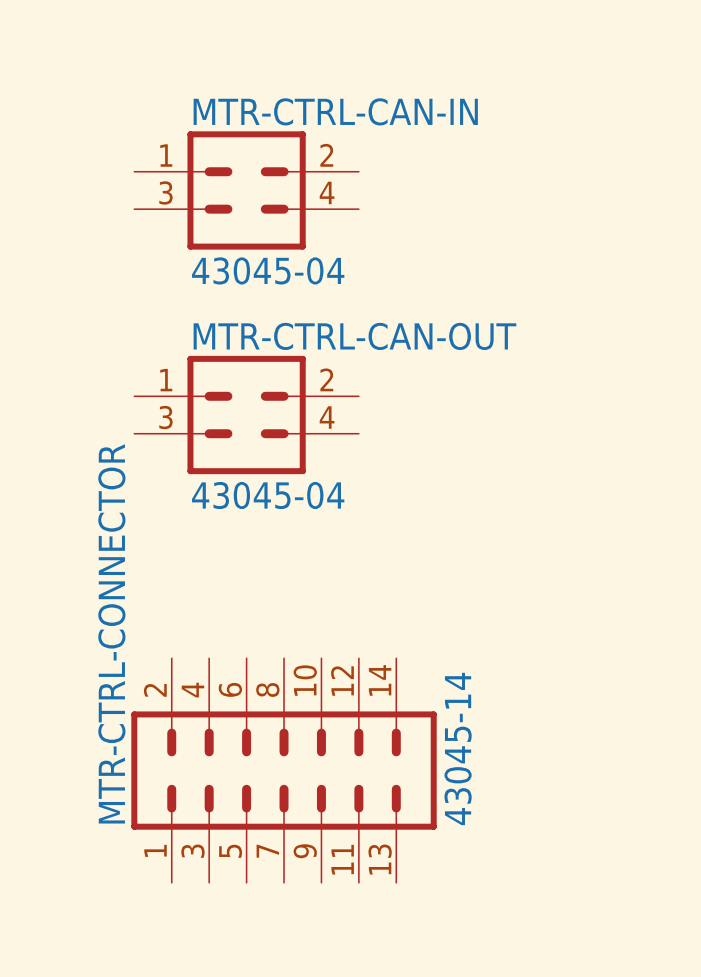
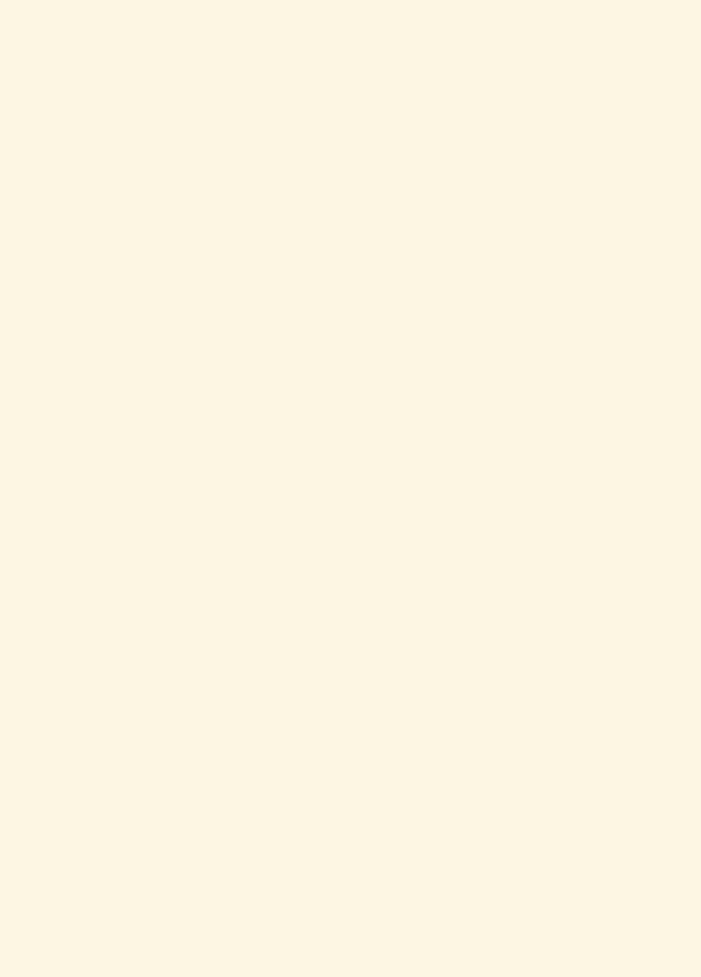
MTR-CTRL-CAN-IN: 43045-04 (246, 190) -> none
MTR-CTRL-CAN-OUT: 43045-04 (246, 415) -> none
MTR-CTRL-CONNECTOR: 43045-14 (284, 770) -> none

